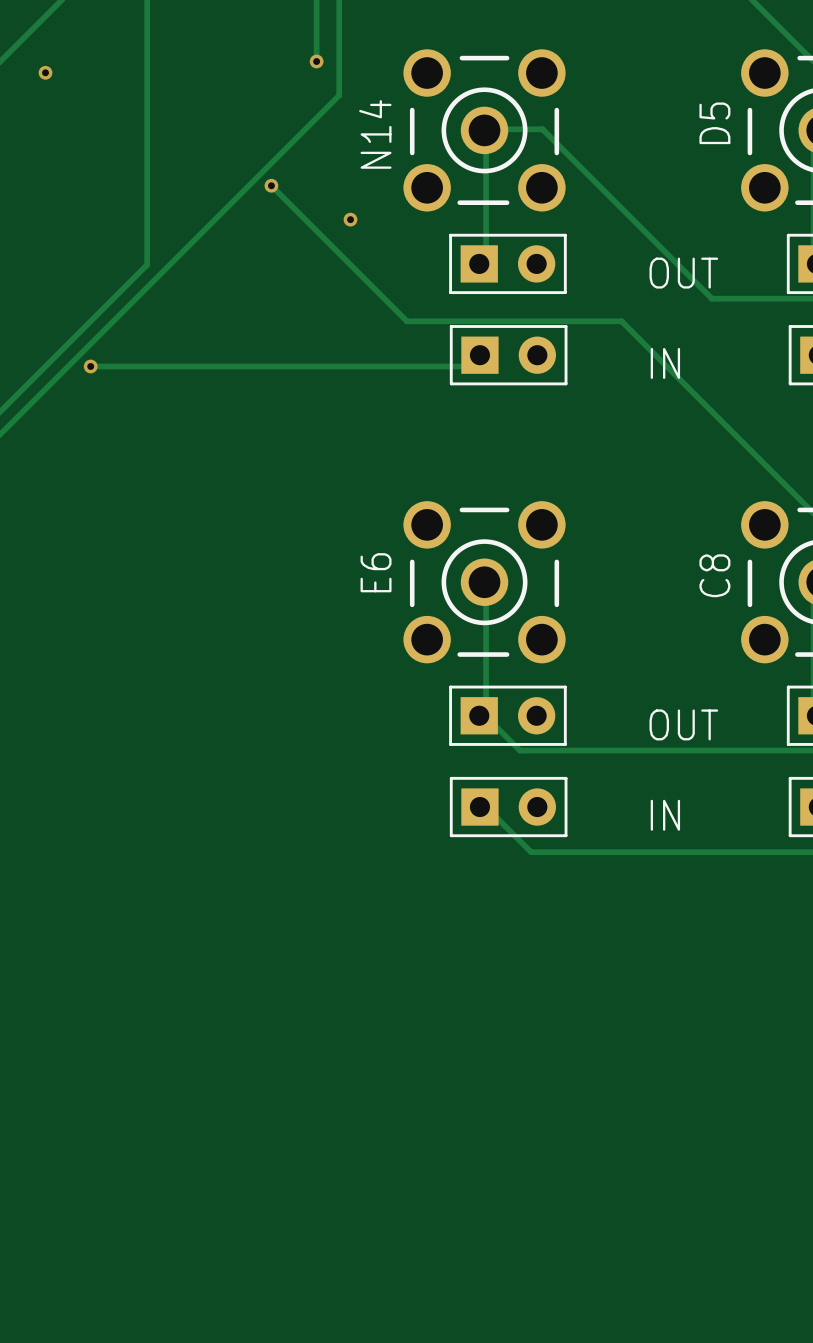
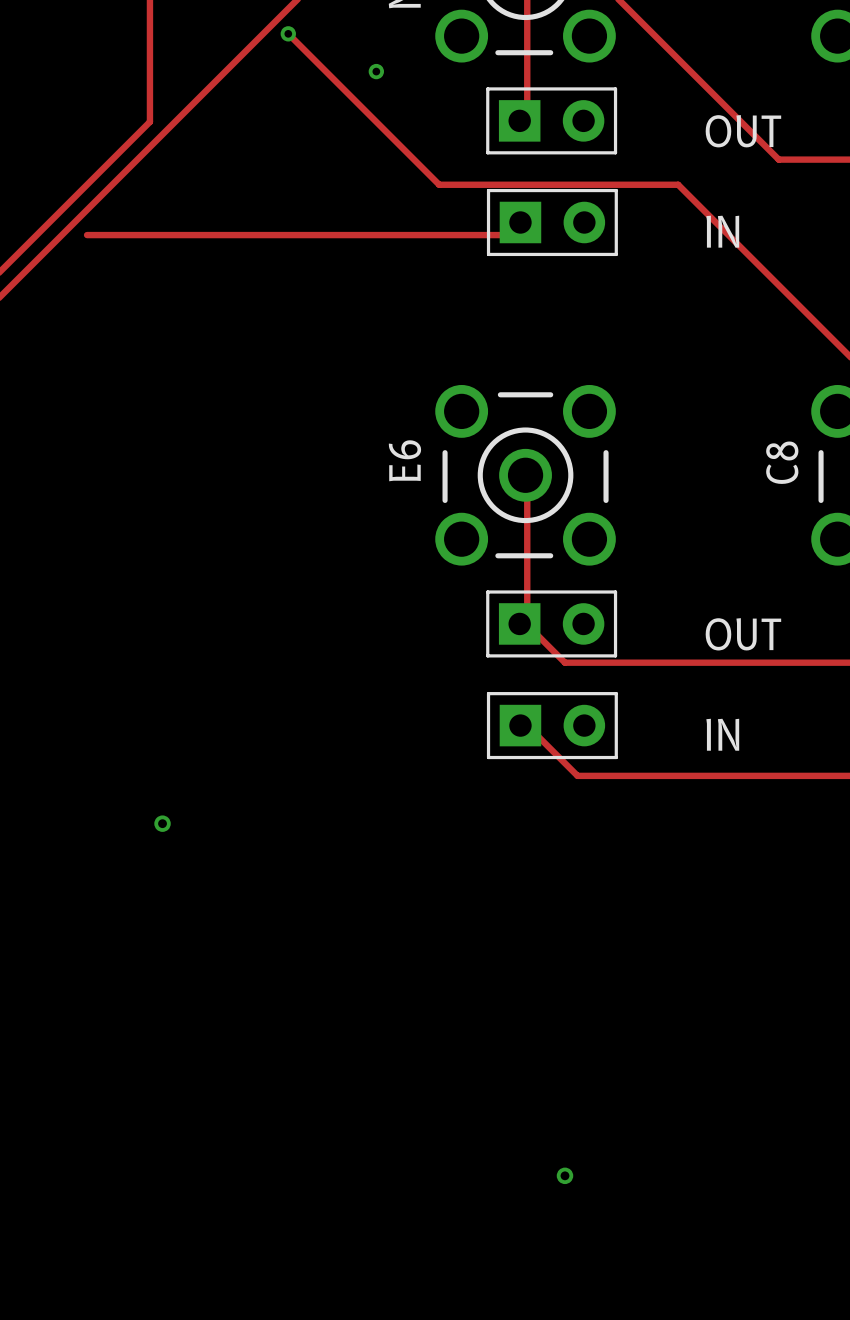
via: (90, 366) -> none
via: none -> (162, 823)
via: none -> (564, 1175)

